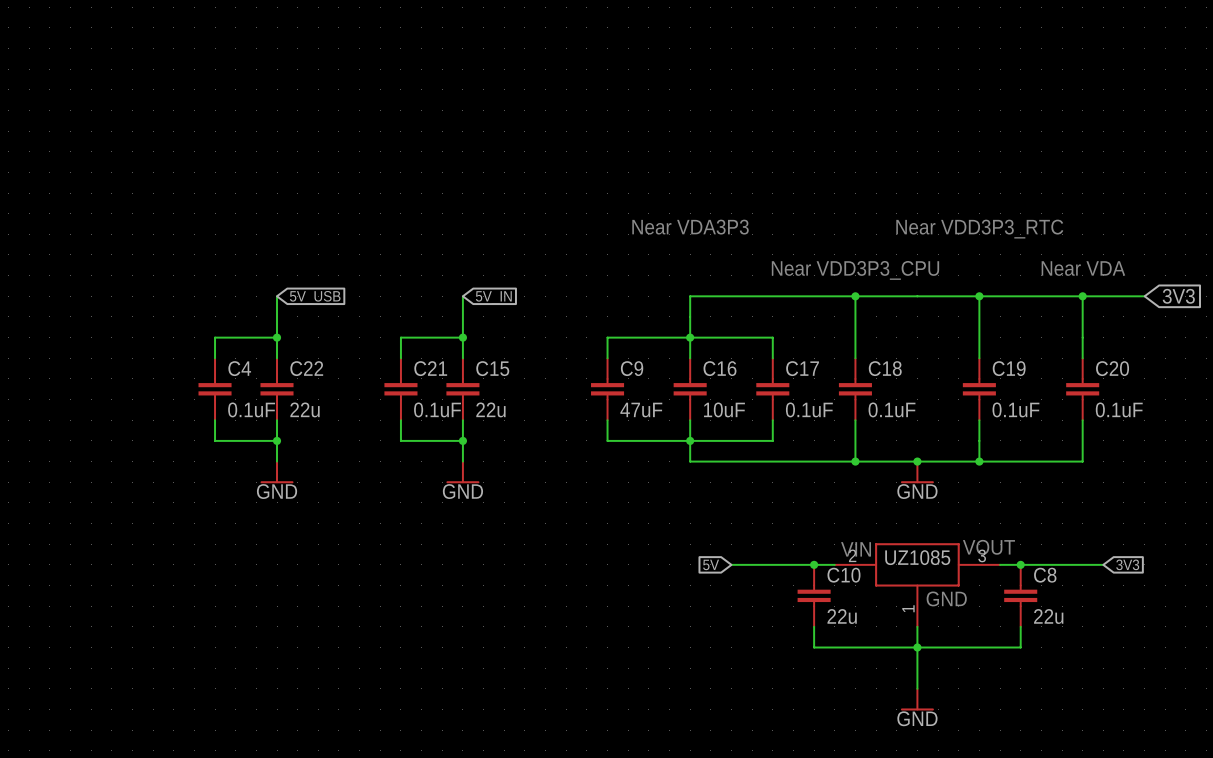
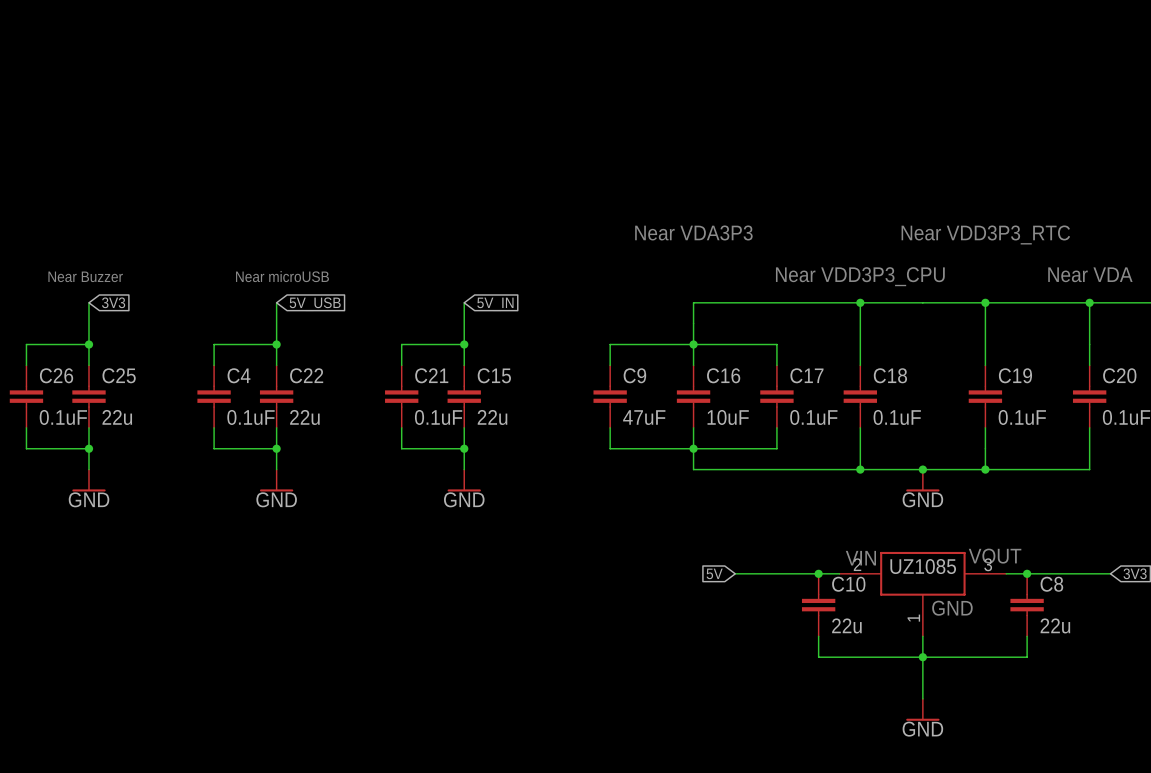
text: none -> Near Buzzer (85, 276)
text: none -> Near microUSB (282, 276)
wire: none -> (88, 302) (88, 365)
global label: none -> 3V3 (113, 302)
wire: none -> (88, 344) (26, 344) (26, 365)
junction: none -> (88, 344)
C26: none -> 0.1uF (26, 396)
C25: none -> 22u (88, 396)
wire: none -> (26, 427) (26, 448) (88, 448)
wire: none -> (88, 427) (88, 469)
junction: none -> (88, 448)
power symbol: none -> GND (88, 480)

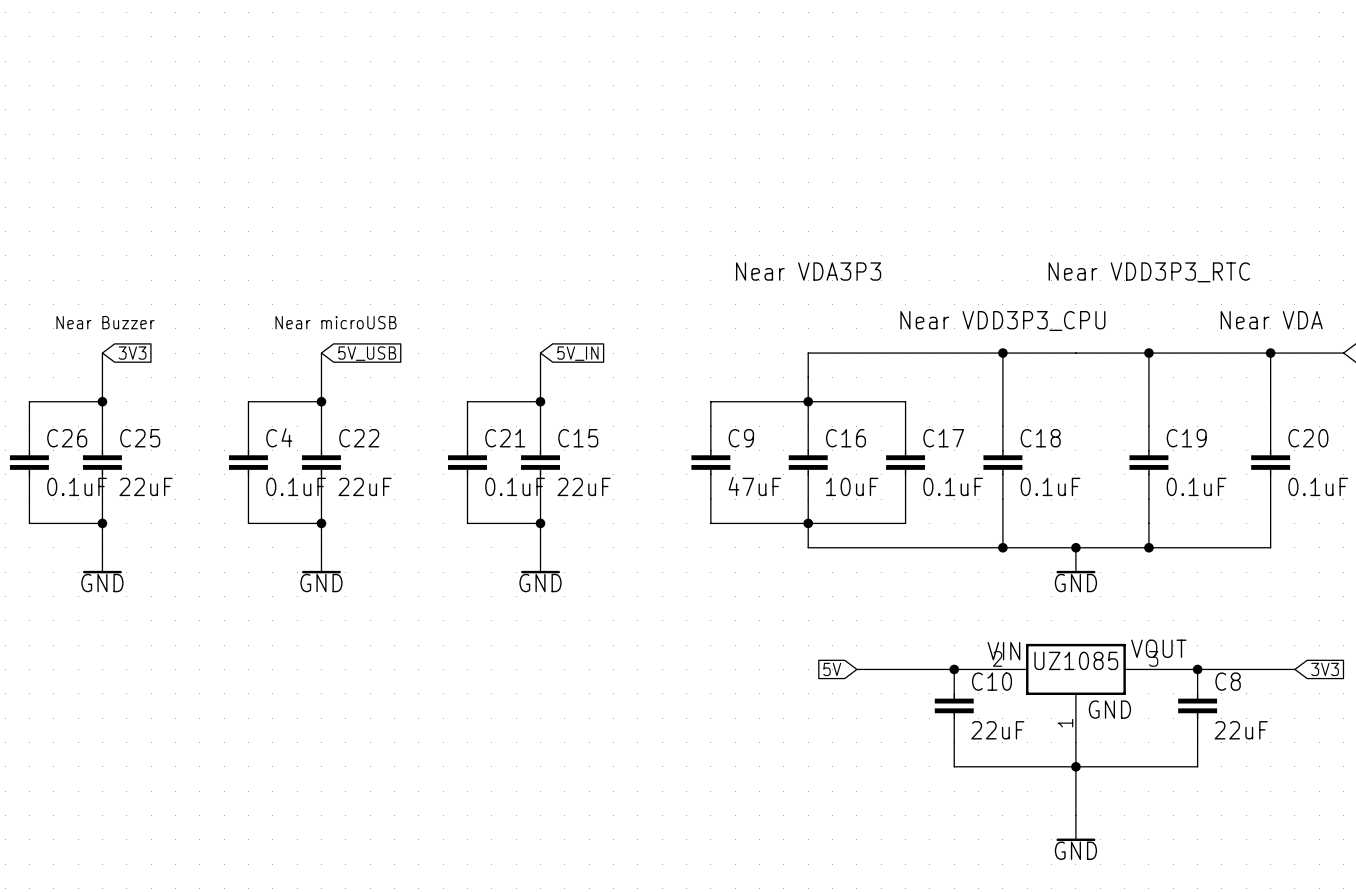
C25 value: 22u (117, 417) -> 22uF (146, 486)
C22 value: 22u (304, 417) -> 22uF (365, 486)
C15 value: 22u (492, 417) -> 22uF (584, 486)
C10 value: 22u (846, 625) -> 22uF (997, 730)
C8 value: 22u (1055, 625) -> 22uF (1241, 730)

